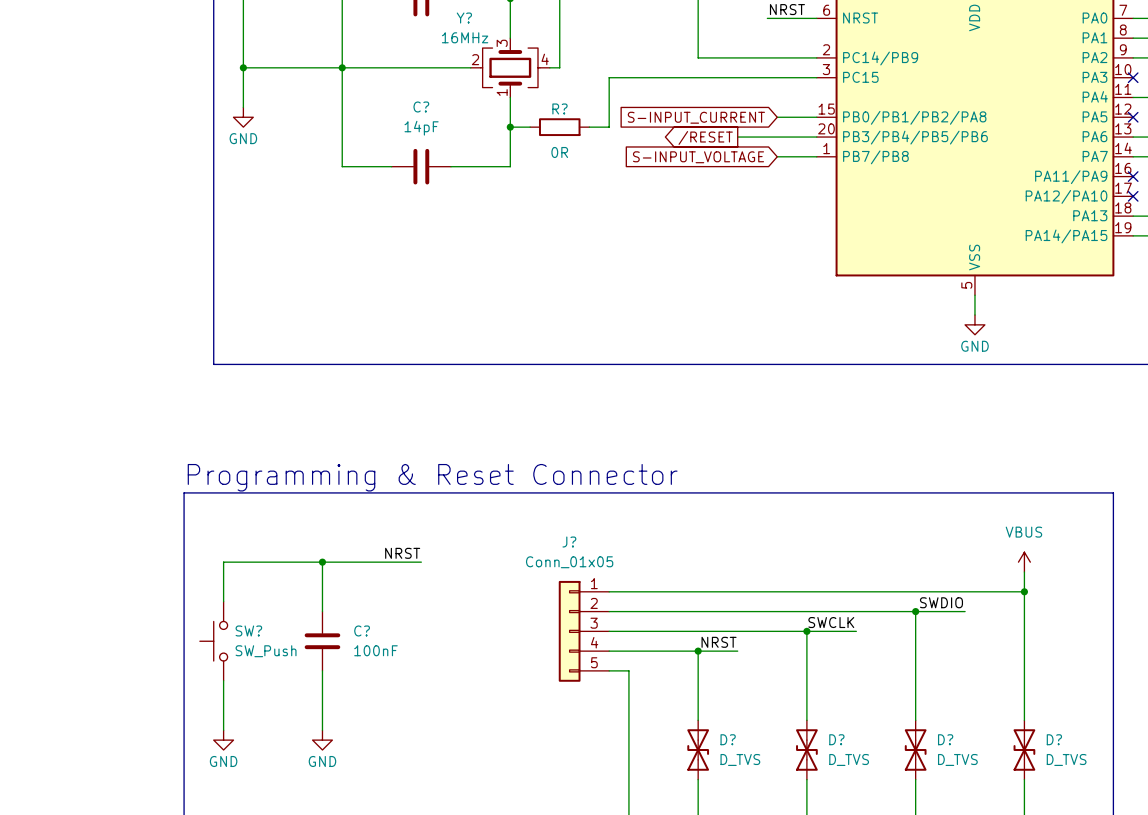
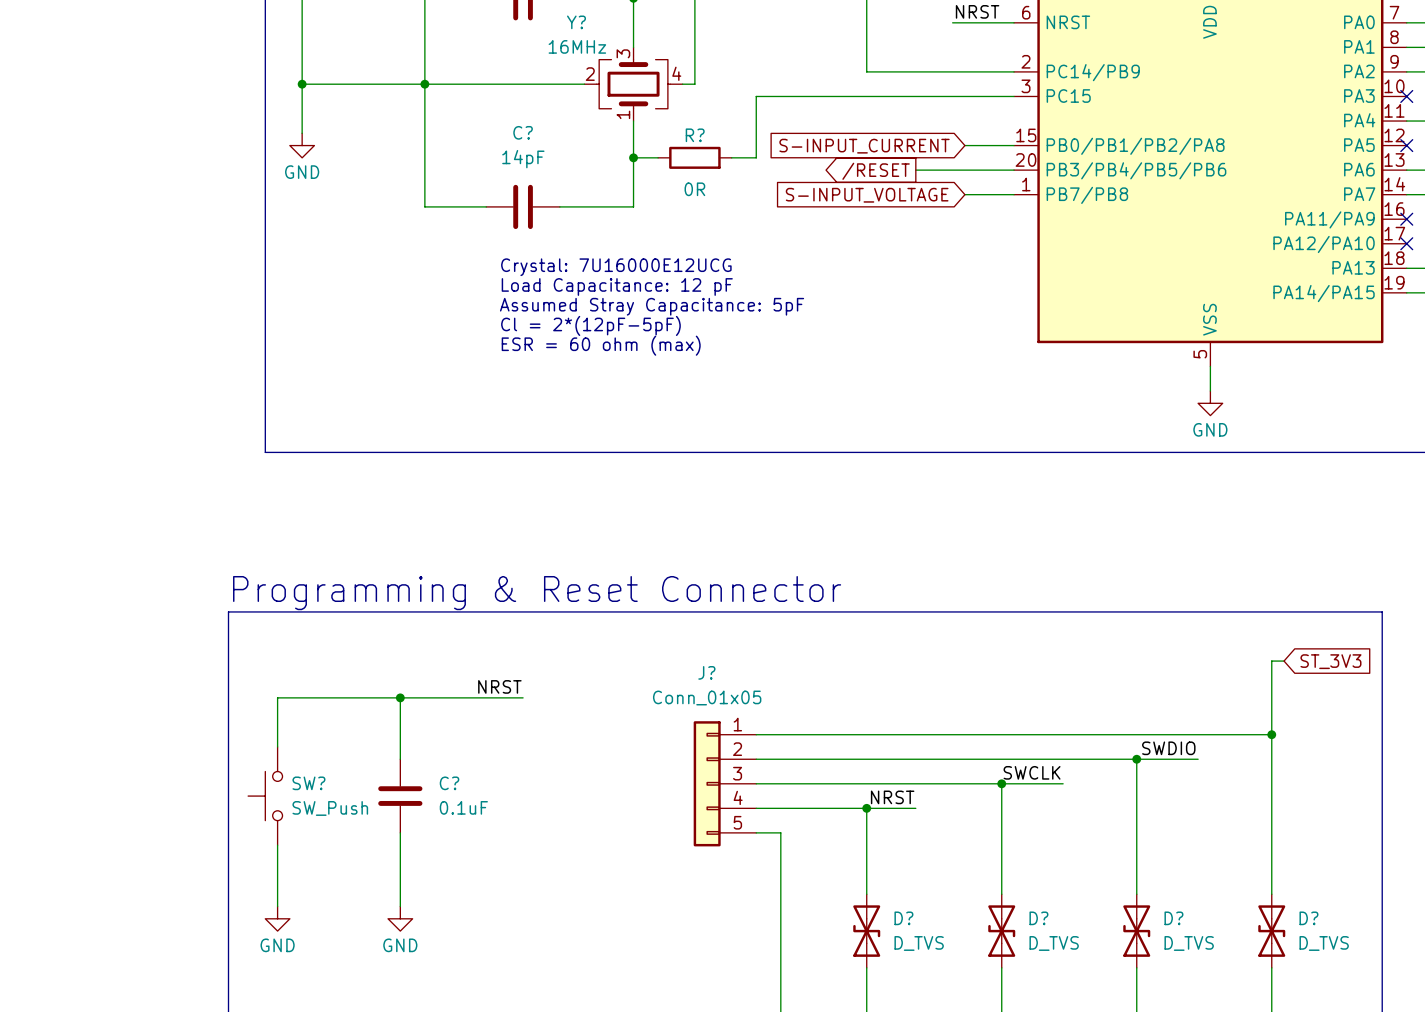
text: none -> Crystal: 7U16000E12UCG (616, 267)
text: none -> Load Capacitance: 12 pF (617, 286)
text: none -> Assumed Stray Capacitance: 5pF (652, 306)
text: none -> Cl = 2*(12pF-5pF) (590, 325)
text: none -> ESR = 60 ohm (max) (601, 345)
wire: none -> (1284, 661) (1271, 661) (1271, 710)
global label: none -> ST_3V3 (1330, 661)
power symbol: VBUS (1024, 562) -> none
C? value: 100nF (375, 650) -> 0.1uF (463, 807)

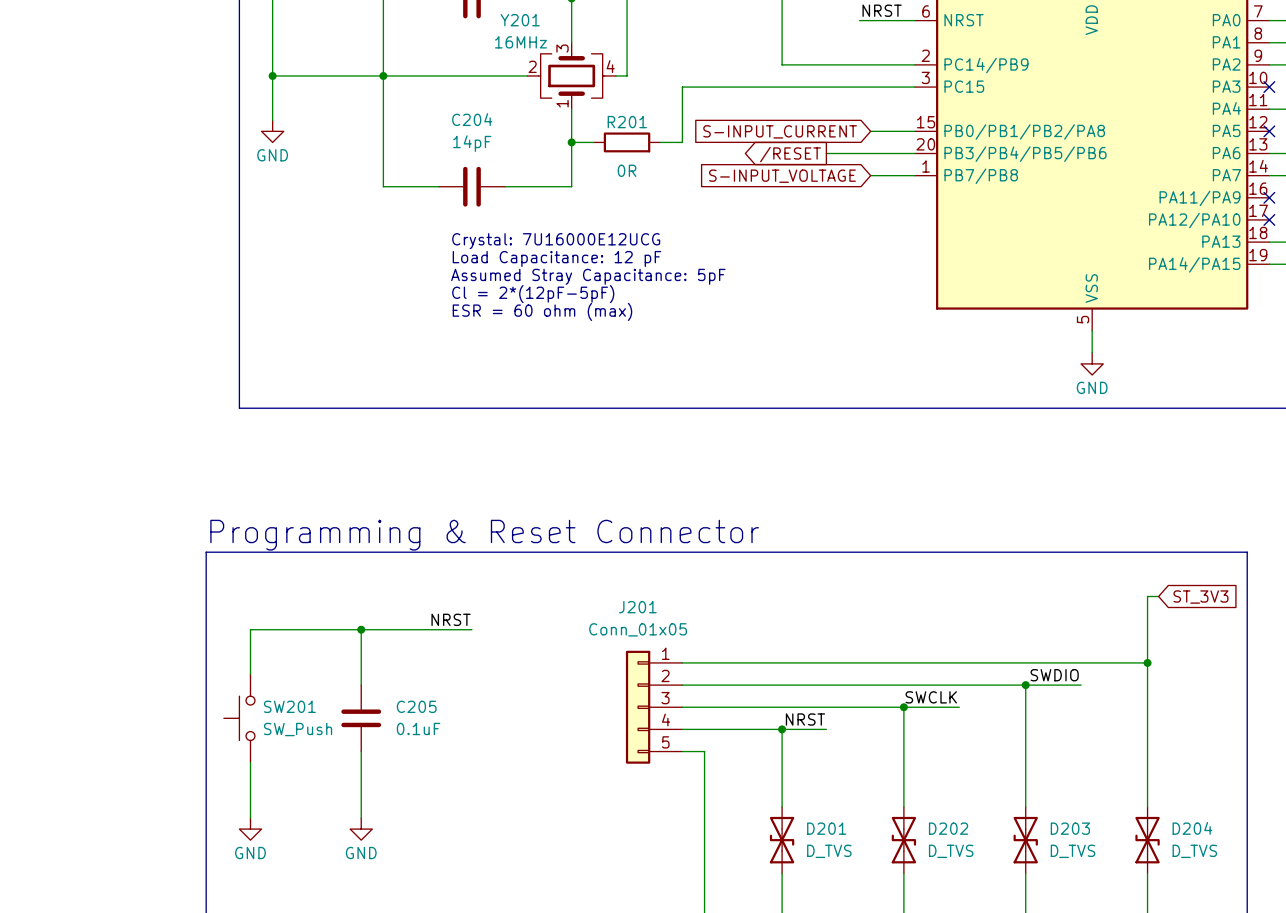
Y? name: Y? (576, 22) -> Y201 (520, 20)
C? name: C? (523, 132) -> C204 (472, 119)
R? name: R? (695, 135) -> R201 (627, 122)
J? name: J? (706, 672) -> J201 (637, 607)
SW? name: SW? (308, 783) -> SW201 (289, 706)
C? name: C? (449, 783) -> C205 (416, 706)
D? name: D? (903, 918) -> D201 (826, 828)
D? name: D? (1038, 918) -> D202 (948, 828)
D? name: D? (1173, 918) -> D203 (1070, 828)
D? name: D? (1308, 918) -> D204 (1192, 828)

